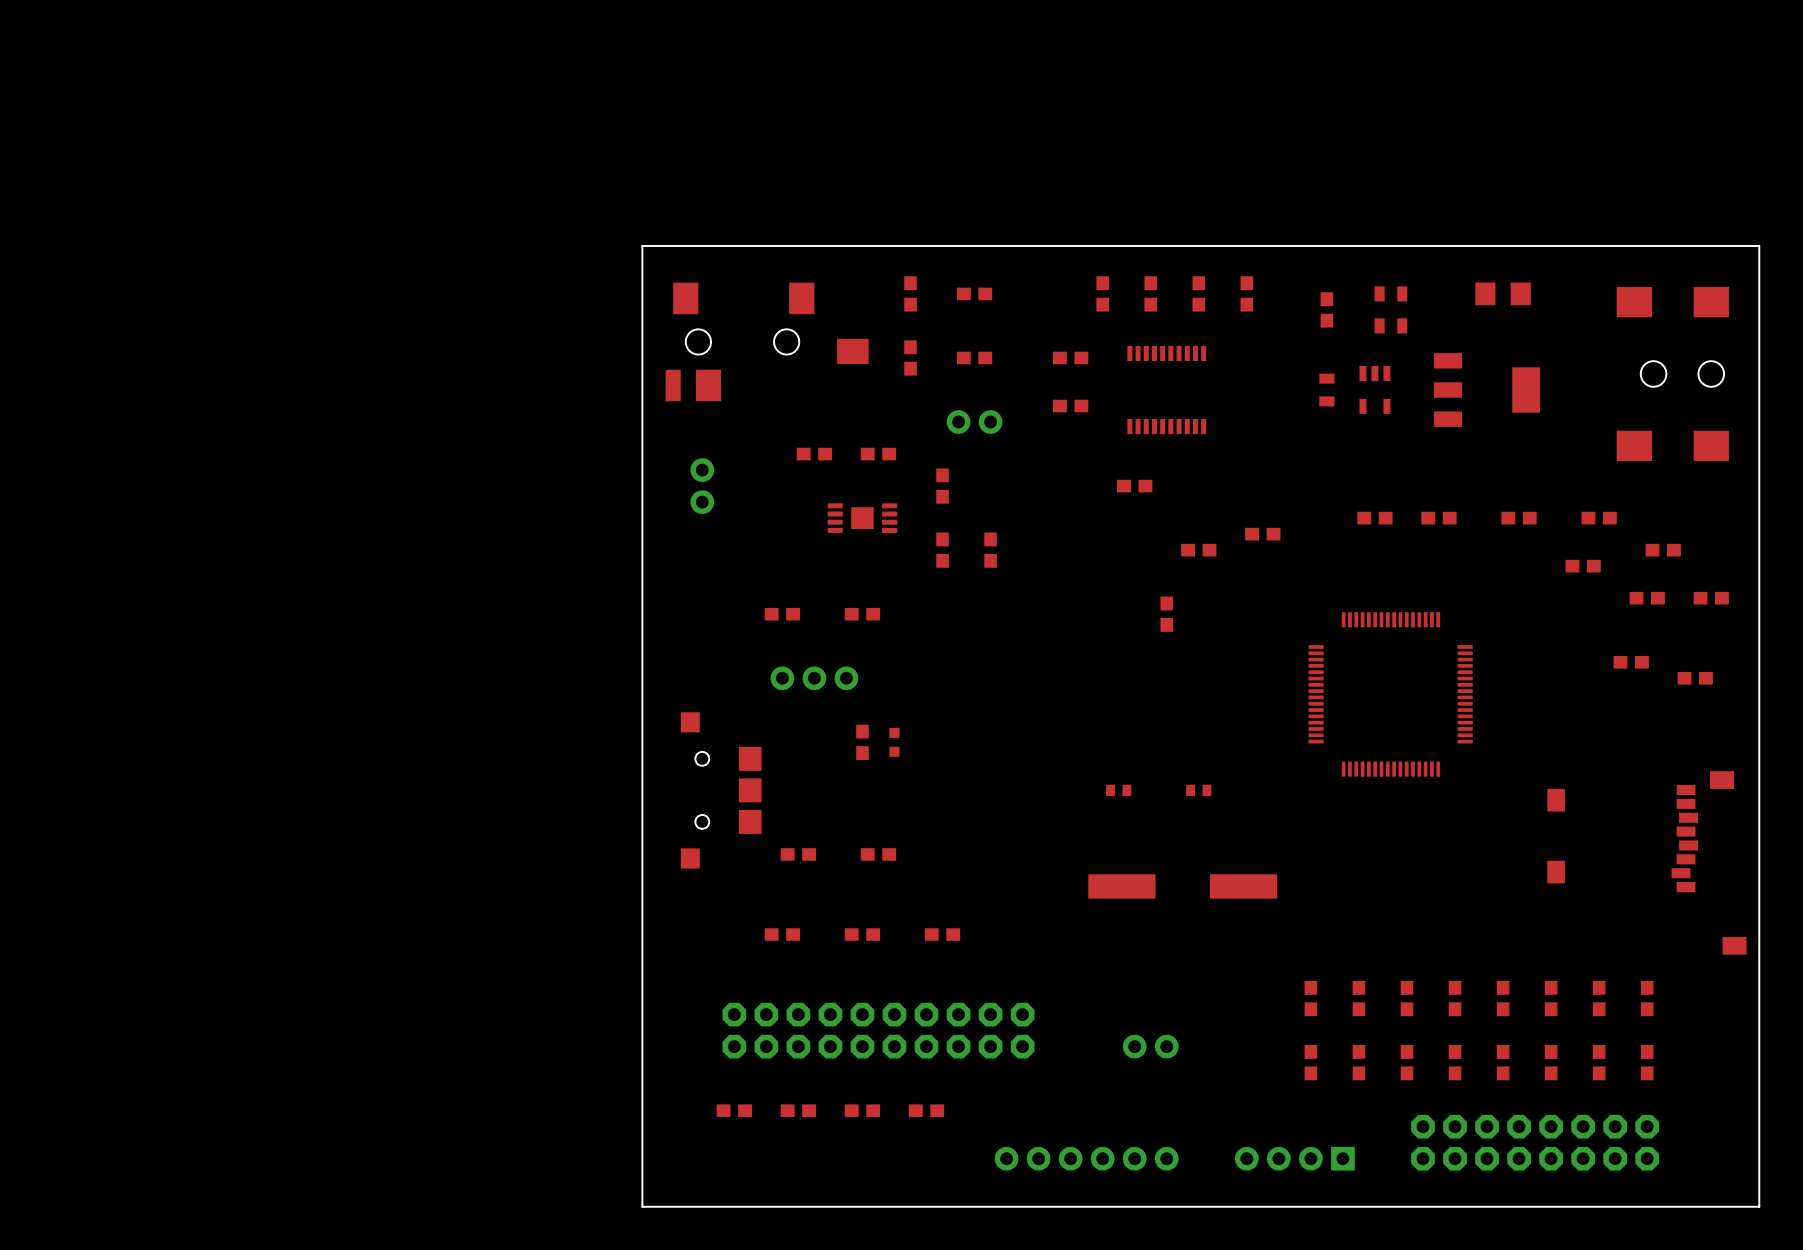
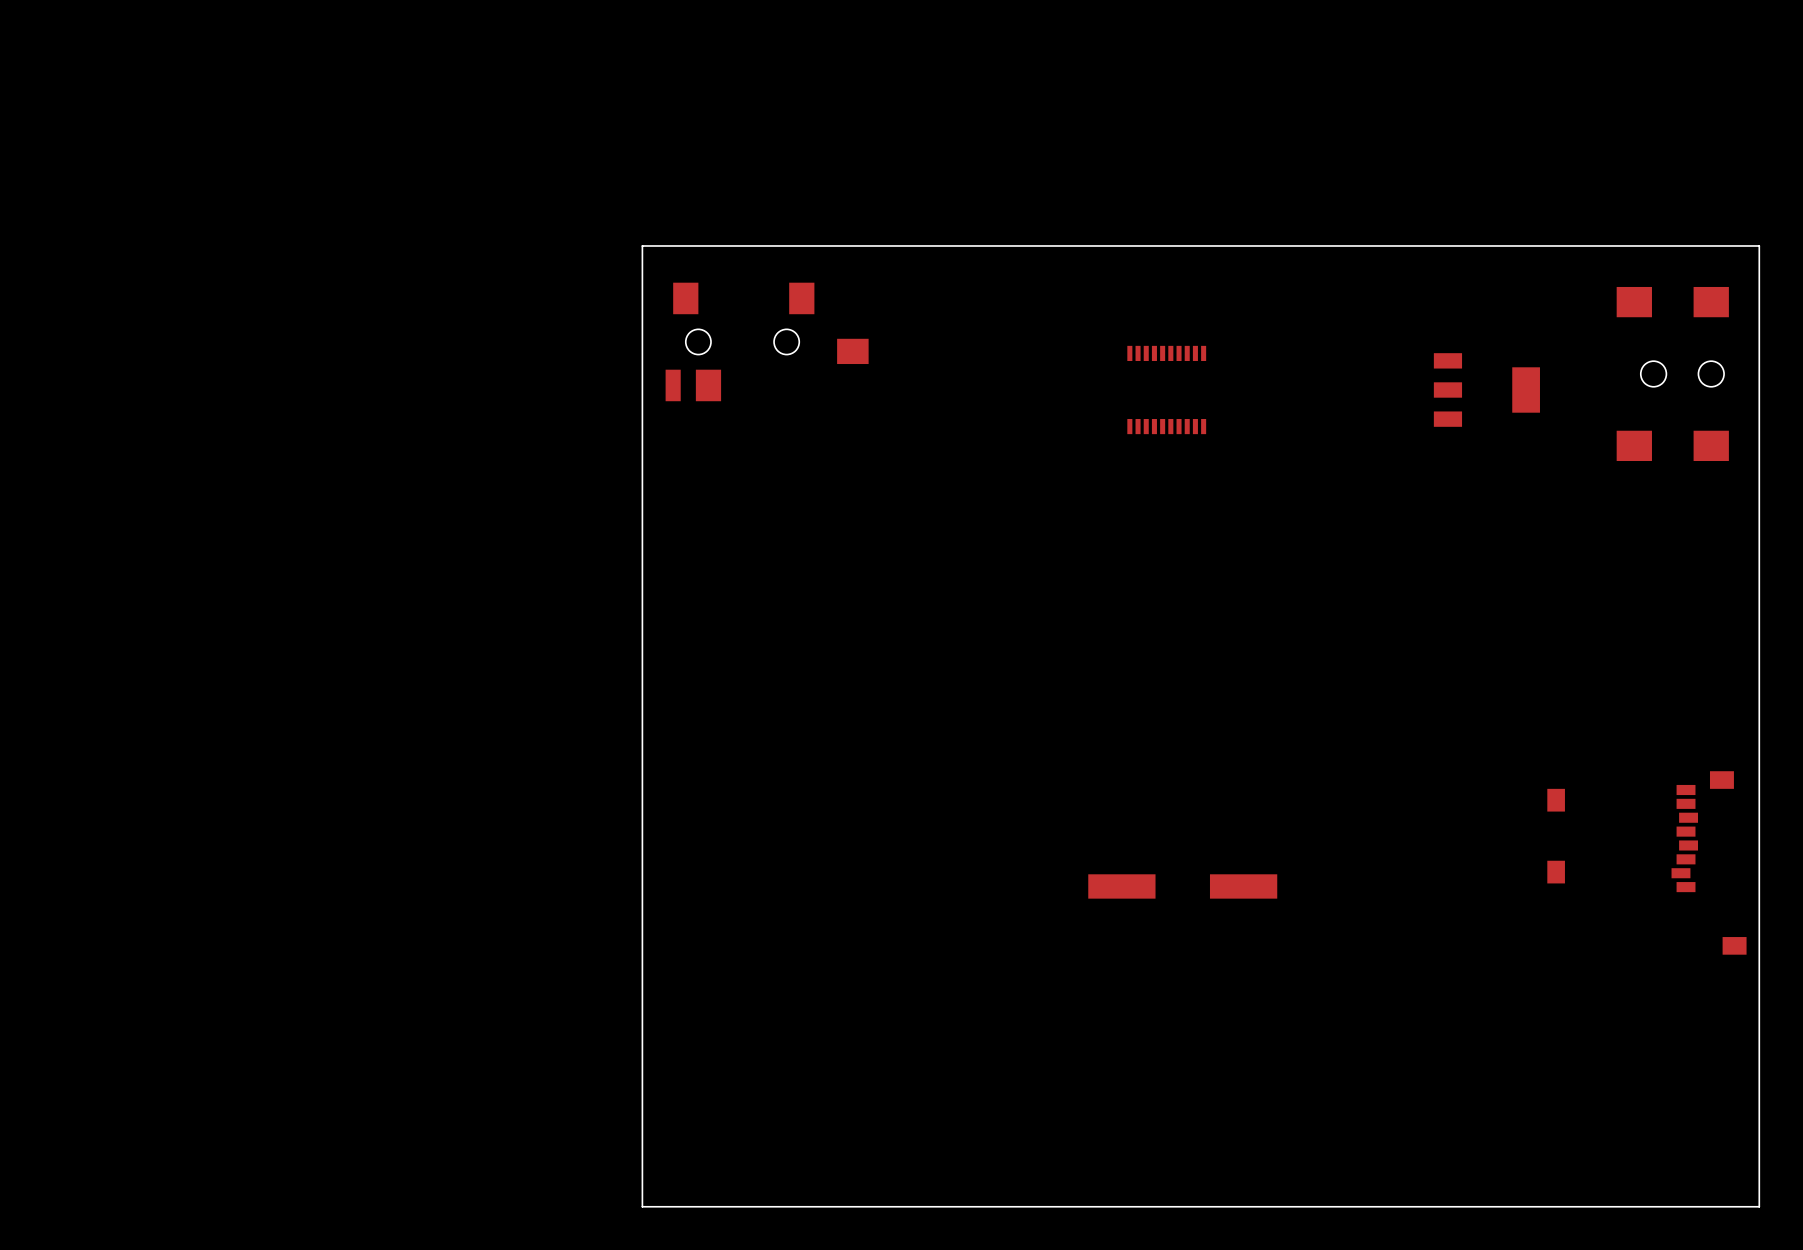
part: (910, 293) -> none
part: (974, 293) -> none
part: (1102, 293) -> none
part: (1150, 293) -> none
part: (1198, 293) -> none
part: (1246, 293) -> none
part: (1390, 293) -> none
part: (1503, 293) -> none
part: (1326, 309) -> none
part: (1390, 325) -> none
part: (910, 357) -> none
part: (974, 357) -> none
part: (1070, 357) -> none
part: (1326, 389) -> none
part: (1374, 389) -> none
part: (1070, 406) -> none
part: (974, 422) -> none
part: (814, 454) -> none
part: (878, 454) -> none
part: (702, 486) -> none
part: (942, 486) -> none
part: (1134, 486) -> none
part: (862, 518) -> none
part: (1374, 518) -> none
part: (1438, 518) -> none
part: (1519, 518) -> none
part: (1599, 518) -> none
part: (1262, 534) -> none
part: (942, 550) -> none
part: (990, 550) -> none
part: (1198, 550) -> none
part: (1663, 550) -> none
part: (1583, 566) -> none
part: (1647, 598) -> none
part: (1711, 598) -> none
part: (782, 614) -> none
part: (862, 614) -> none
part: (1166, 614) -> none
part: (1631, 662) -> none
part: (814, 678) -> none
part: (1695, 678) -> none
part: (1390, 694) -> none
part: (862, 742) -> none
part: (894, 742) -> none
part: (721, 790) -> none
part: (1118, 790) -> none
part: (1198, 790) -> none
part: (798, 854) -> none
part: (878, 854) -> none
part: (782, 934) -> none
part: (862, 934) -> none
part: (942, 934) -> none
part: (1310, 998) -> none
part: (1358, 998) -> none
part: (1406, 998) -> none
part: (1455, 998) -> none
part: (1503, 998) -> none
part: (1551, 998) -> none
part: (1599, 998) -> none
part: (1647, 998) -> none
part: (878, 1030) -> none
part: (1150, 1046) -> none
part: (1310, 1062) -> none
part: (1358, 1062) -> none
part: (1406, 1062) -> none
part: (1455, 1062) -> none
part: (1503, 1062) -> none
part: (1551, 1062) -> none
part: (1599, 1062) -> none
part: (1647, 1062) -> none
part: (734, 1110) -> none
part: (798, 1110) -> none
part: (862, 1110) -> none
part: (926, 1110) -> none
part: (1535, 1142) -> none
part: (1086, 1158) -> none
part: (1294, 1158) -> none

